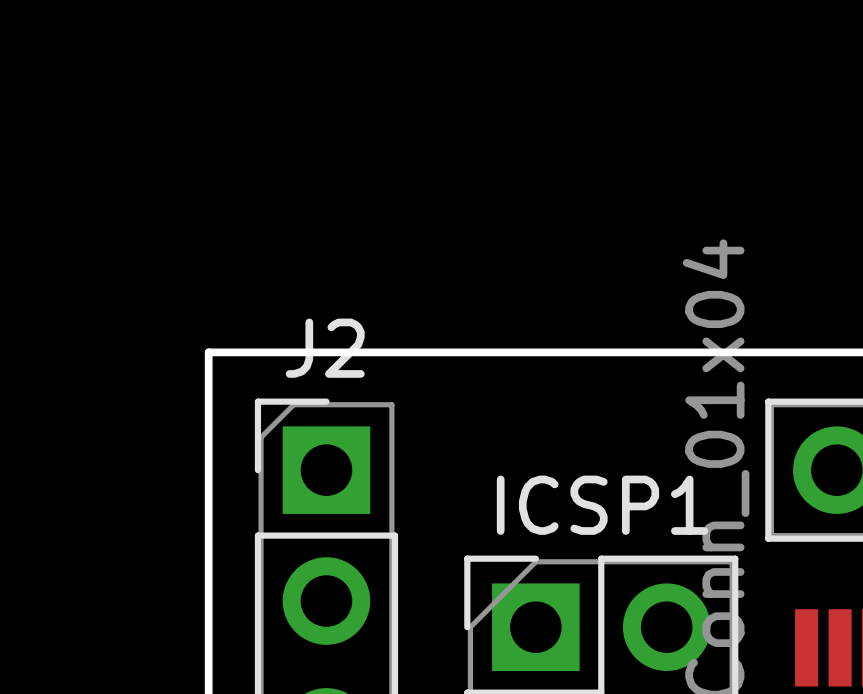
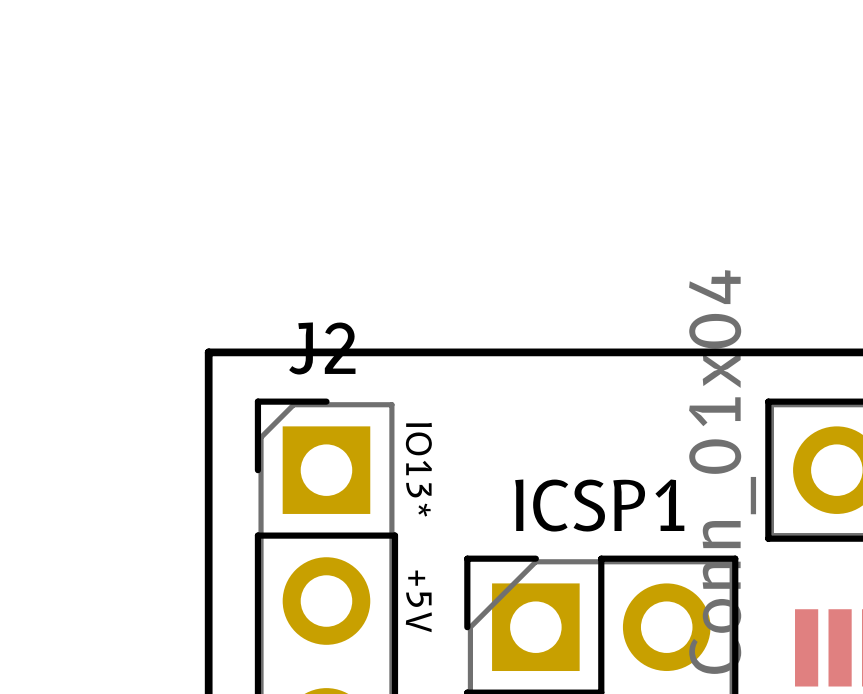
text: none -> IO13* (418, 469)
text: none -> +5V (418, 601)

